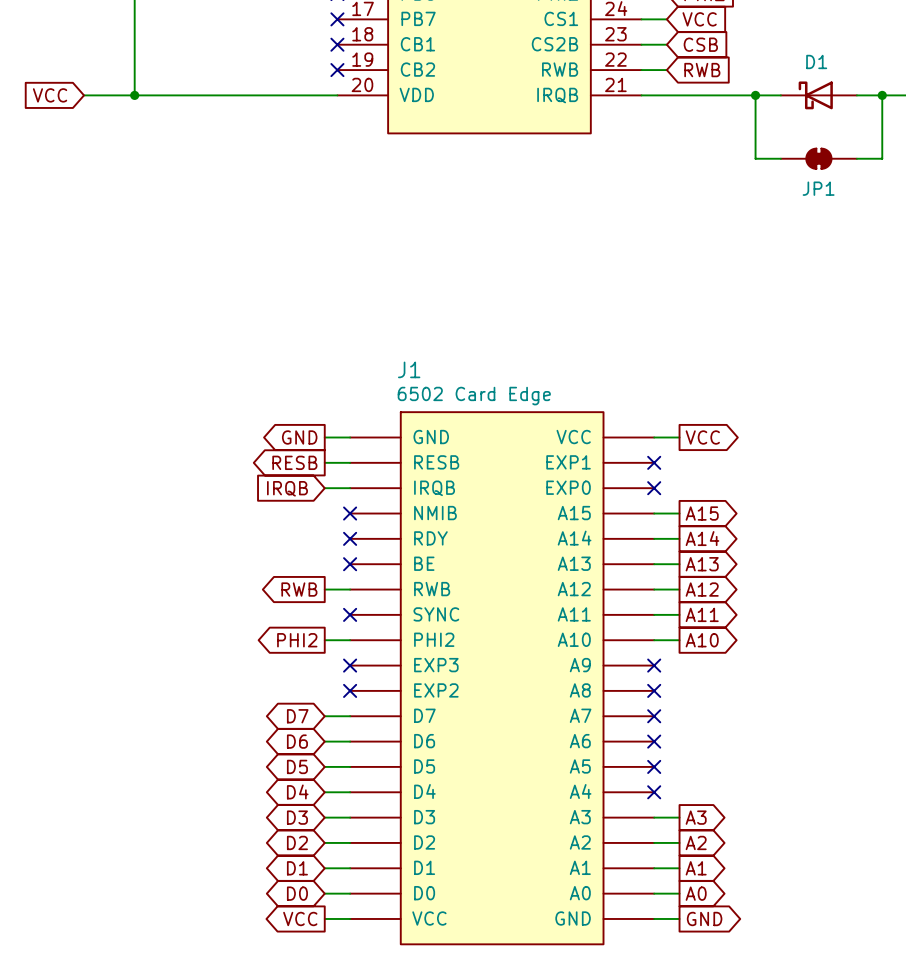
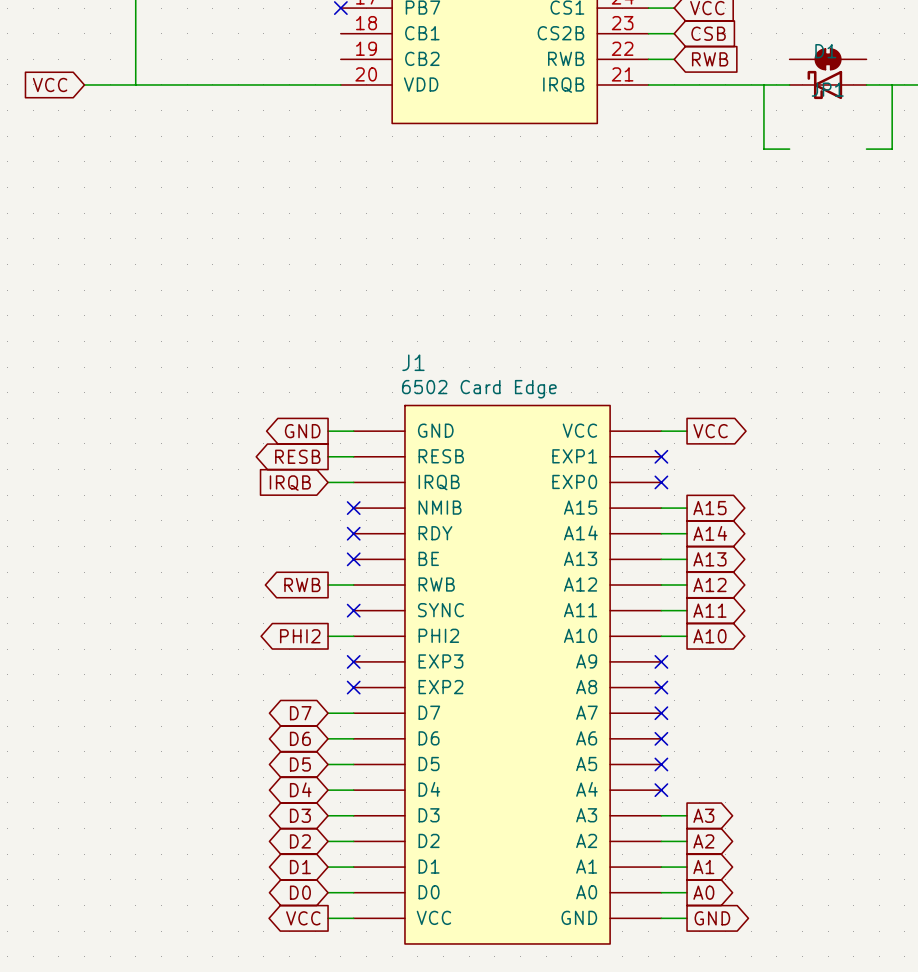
no-connect mark: (337, 44) -> none
no-connect mark: (337, 70) -> none
junction: (134, 95) -> none
junction: (755, 95) -> none
junction: (882, 95) -> none
JP1 position: (818, 158) -> (828, 59)

